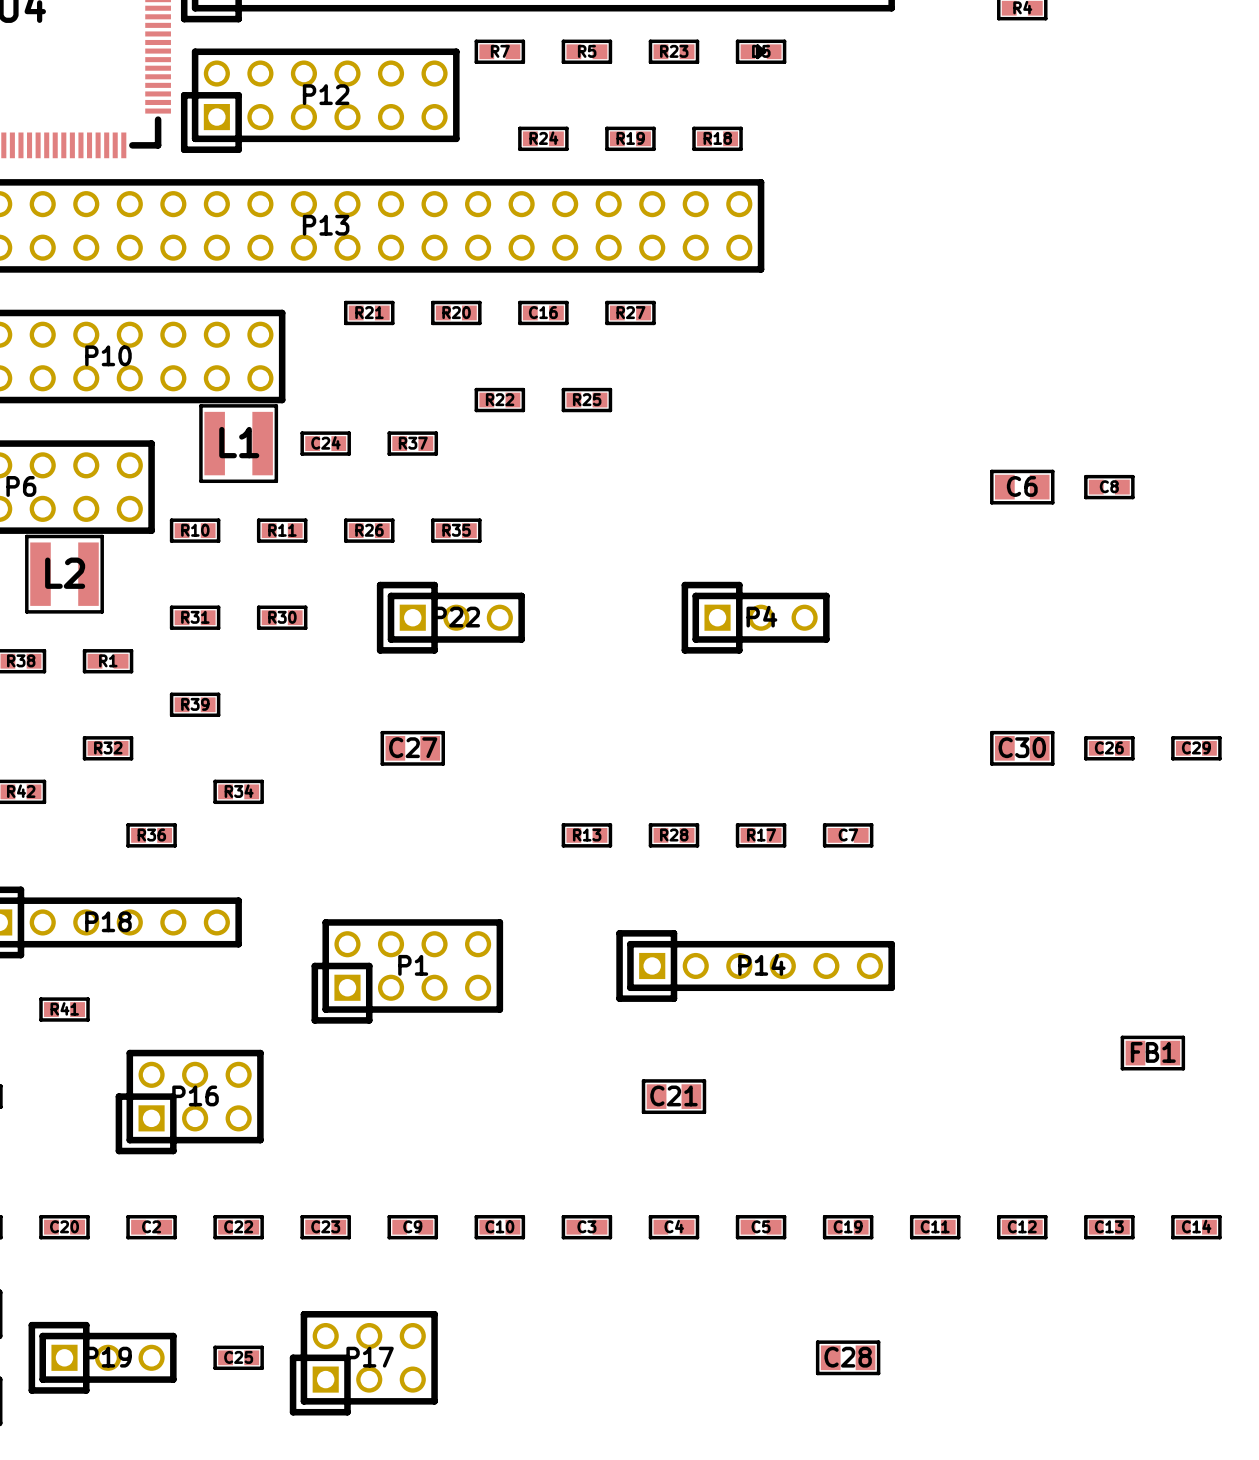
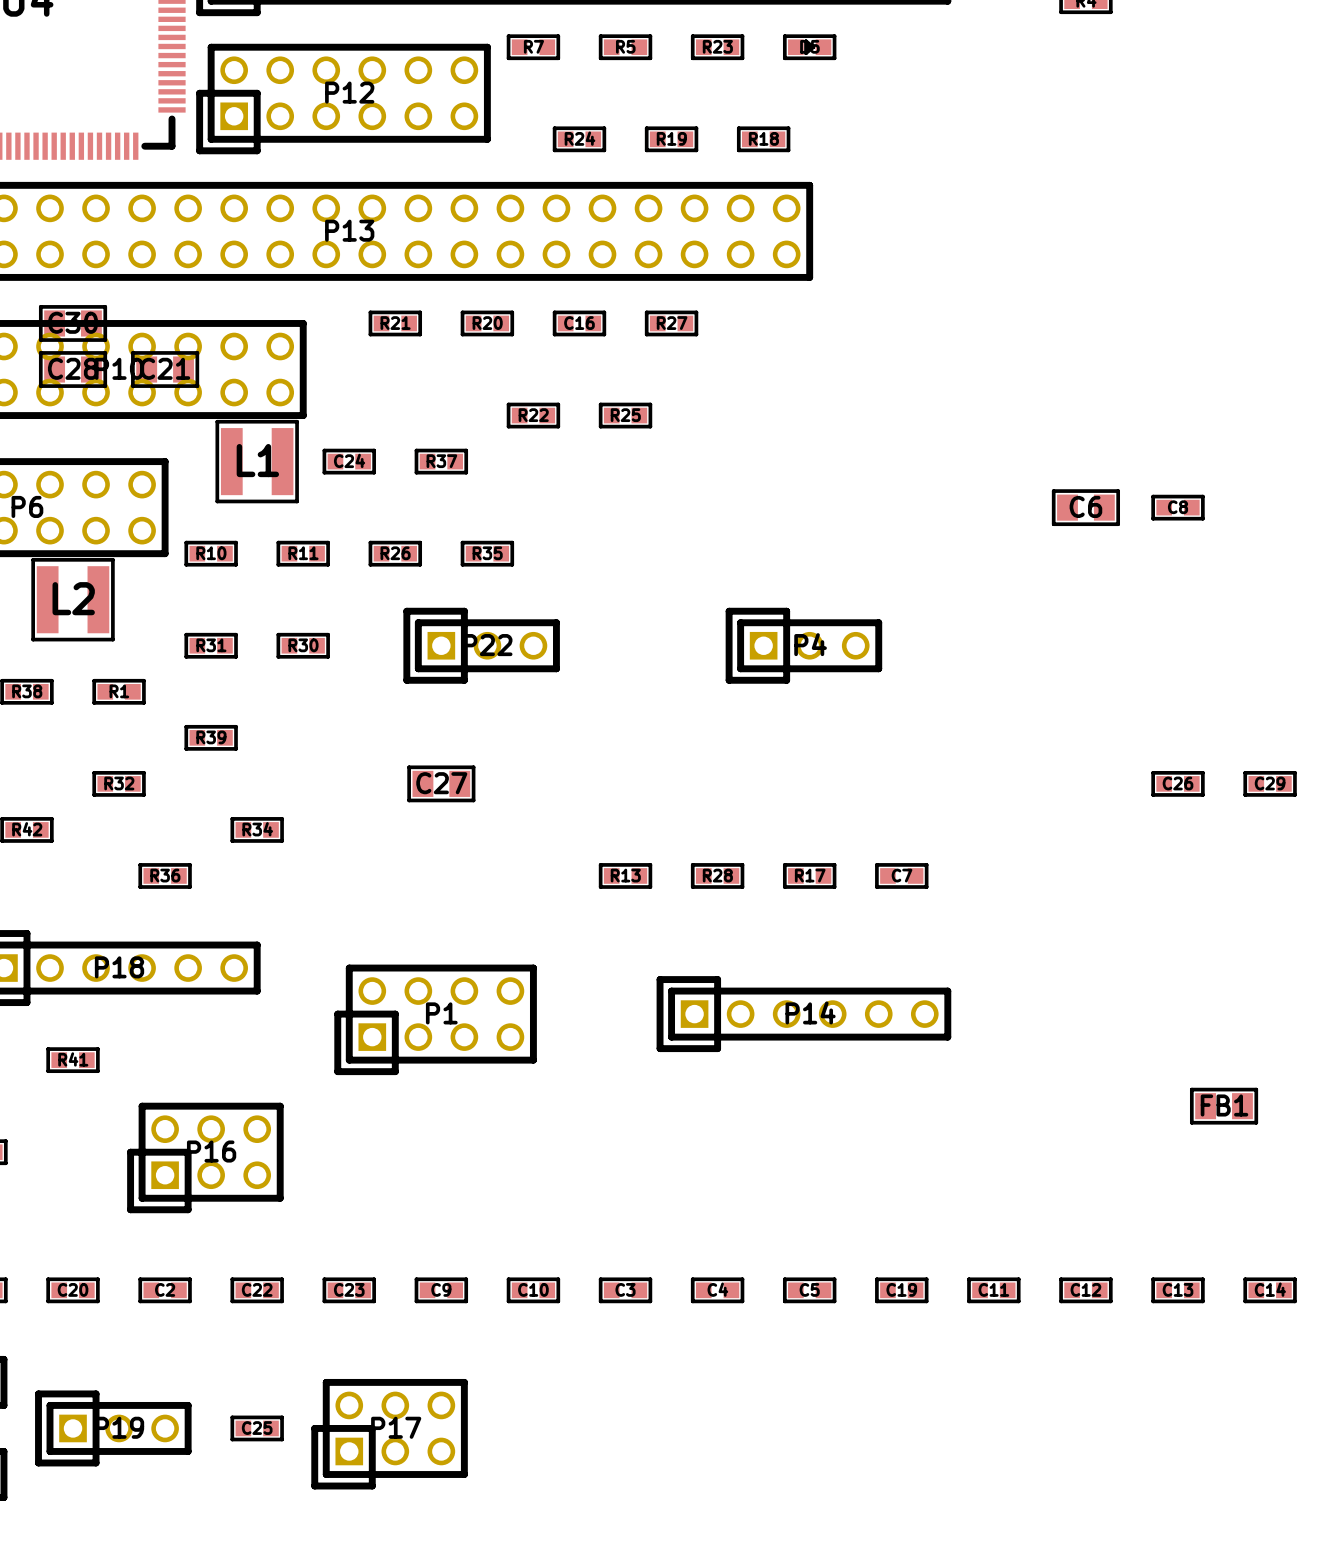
C30 position: (1022, 748) -> (73, 323)
C21 position: (673, 1096) -> (165, 369)
C28 position: (848, 1357) -> (73, 369)

